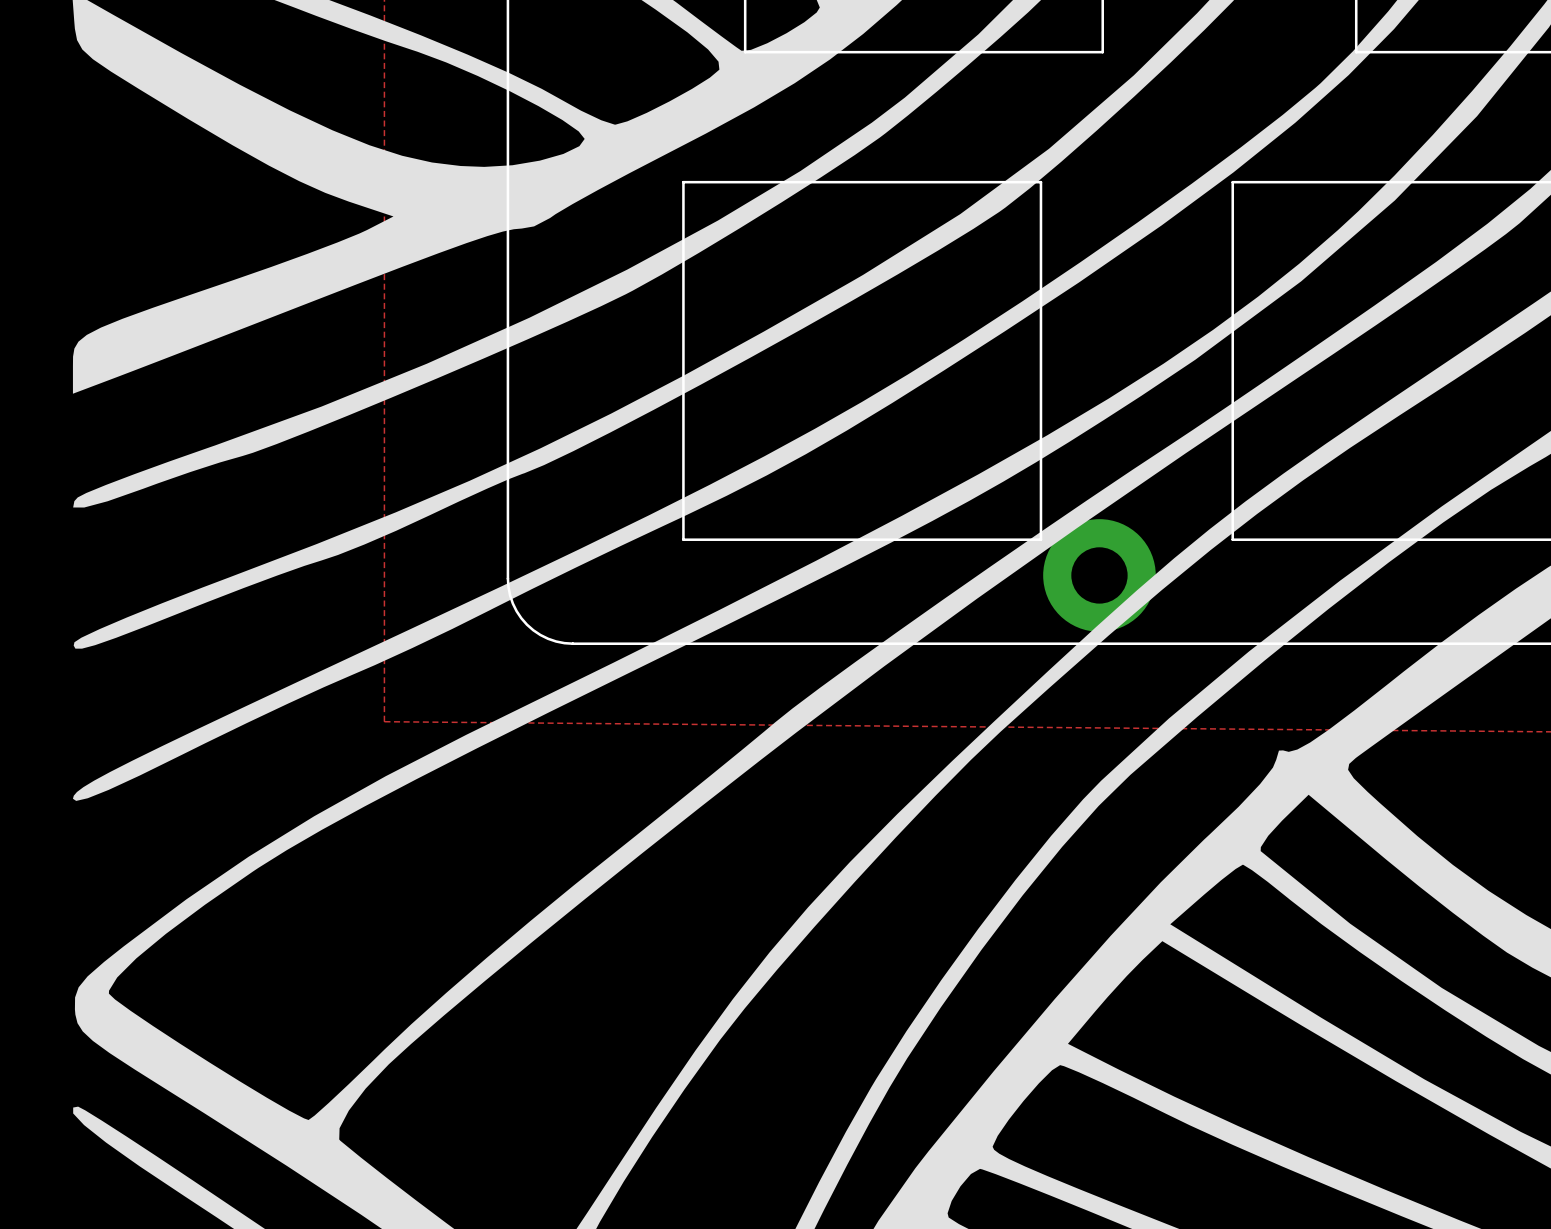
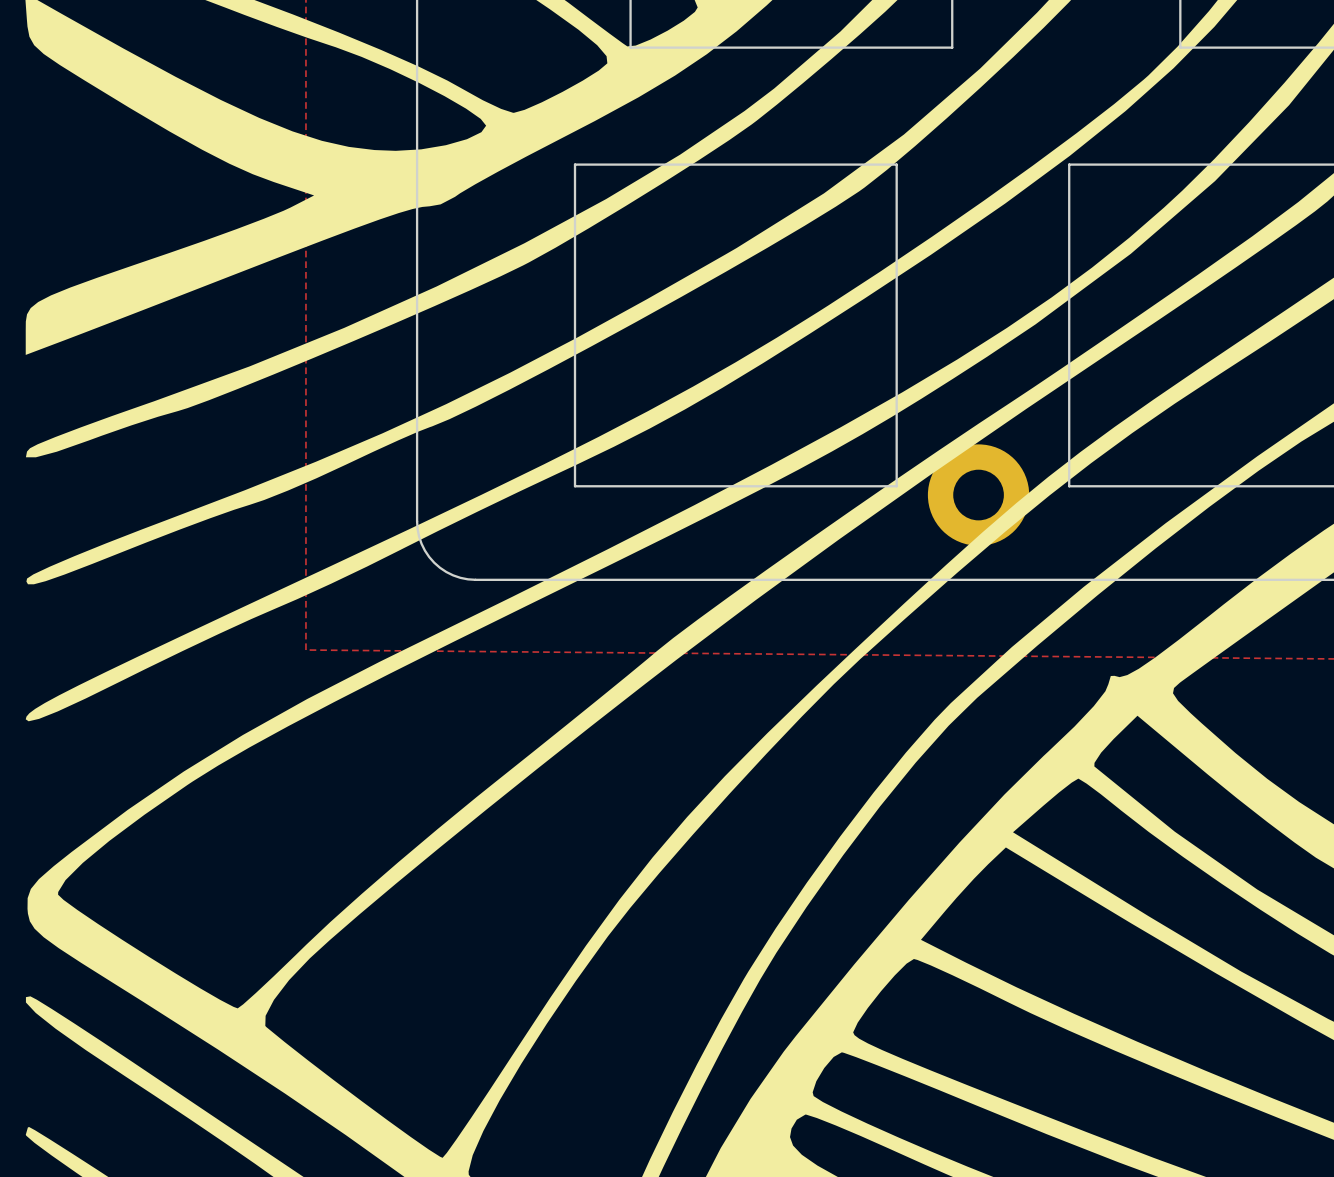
part position: (1099, 575) -> (978, 495)

